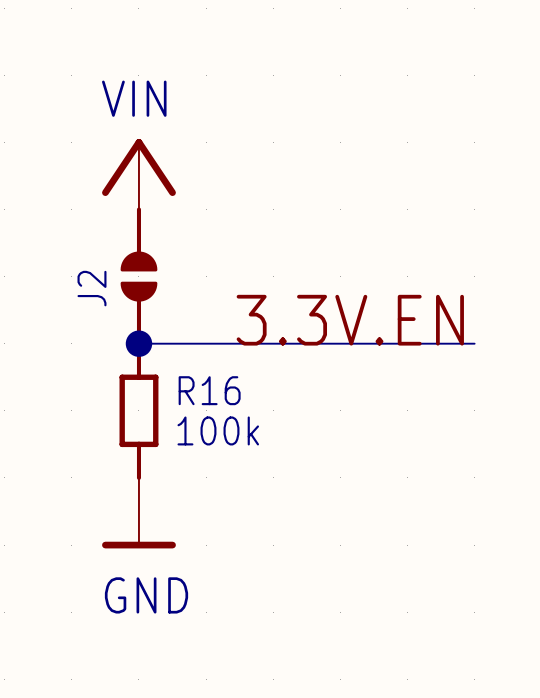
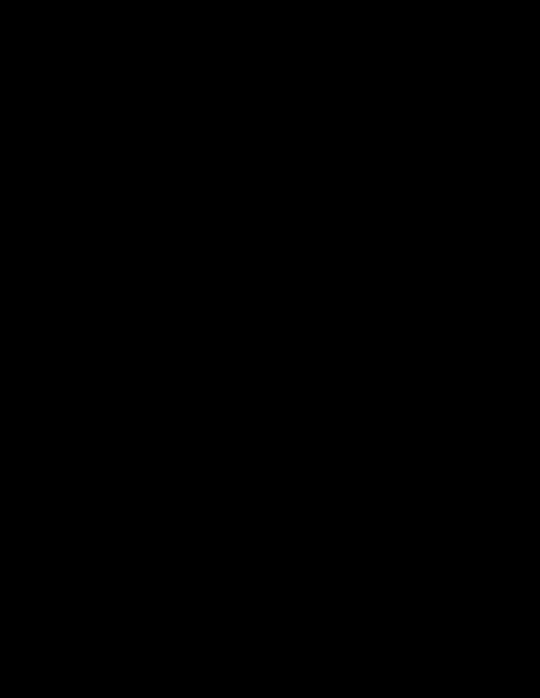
power symbol: VIN (138, 174) -> none
J2: (138, 276) -> none
label: 3.3V.EN (350, 320) -> none
wire: (138, 343) (474, 343) -> none
junction: (138, 343) -> none
R16: 100k (138, 410) -> none
power symbol: GND (138, 513) -> none

